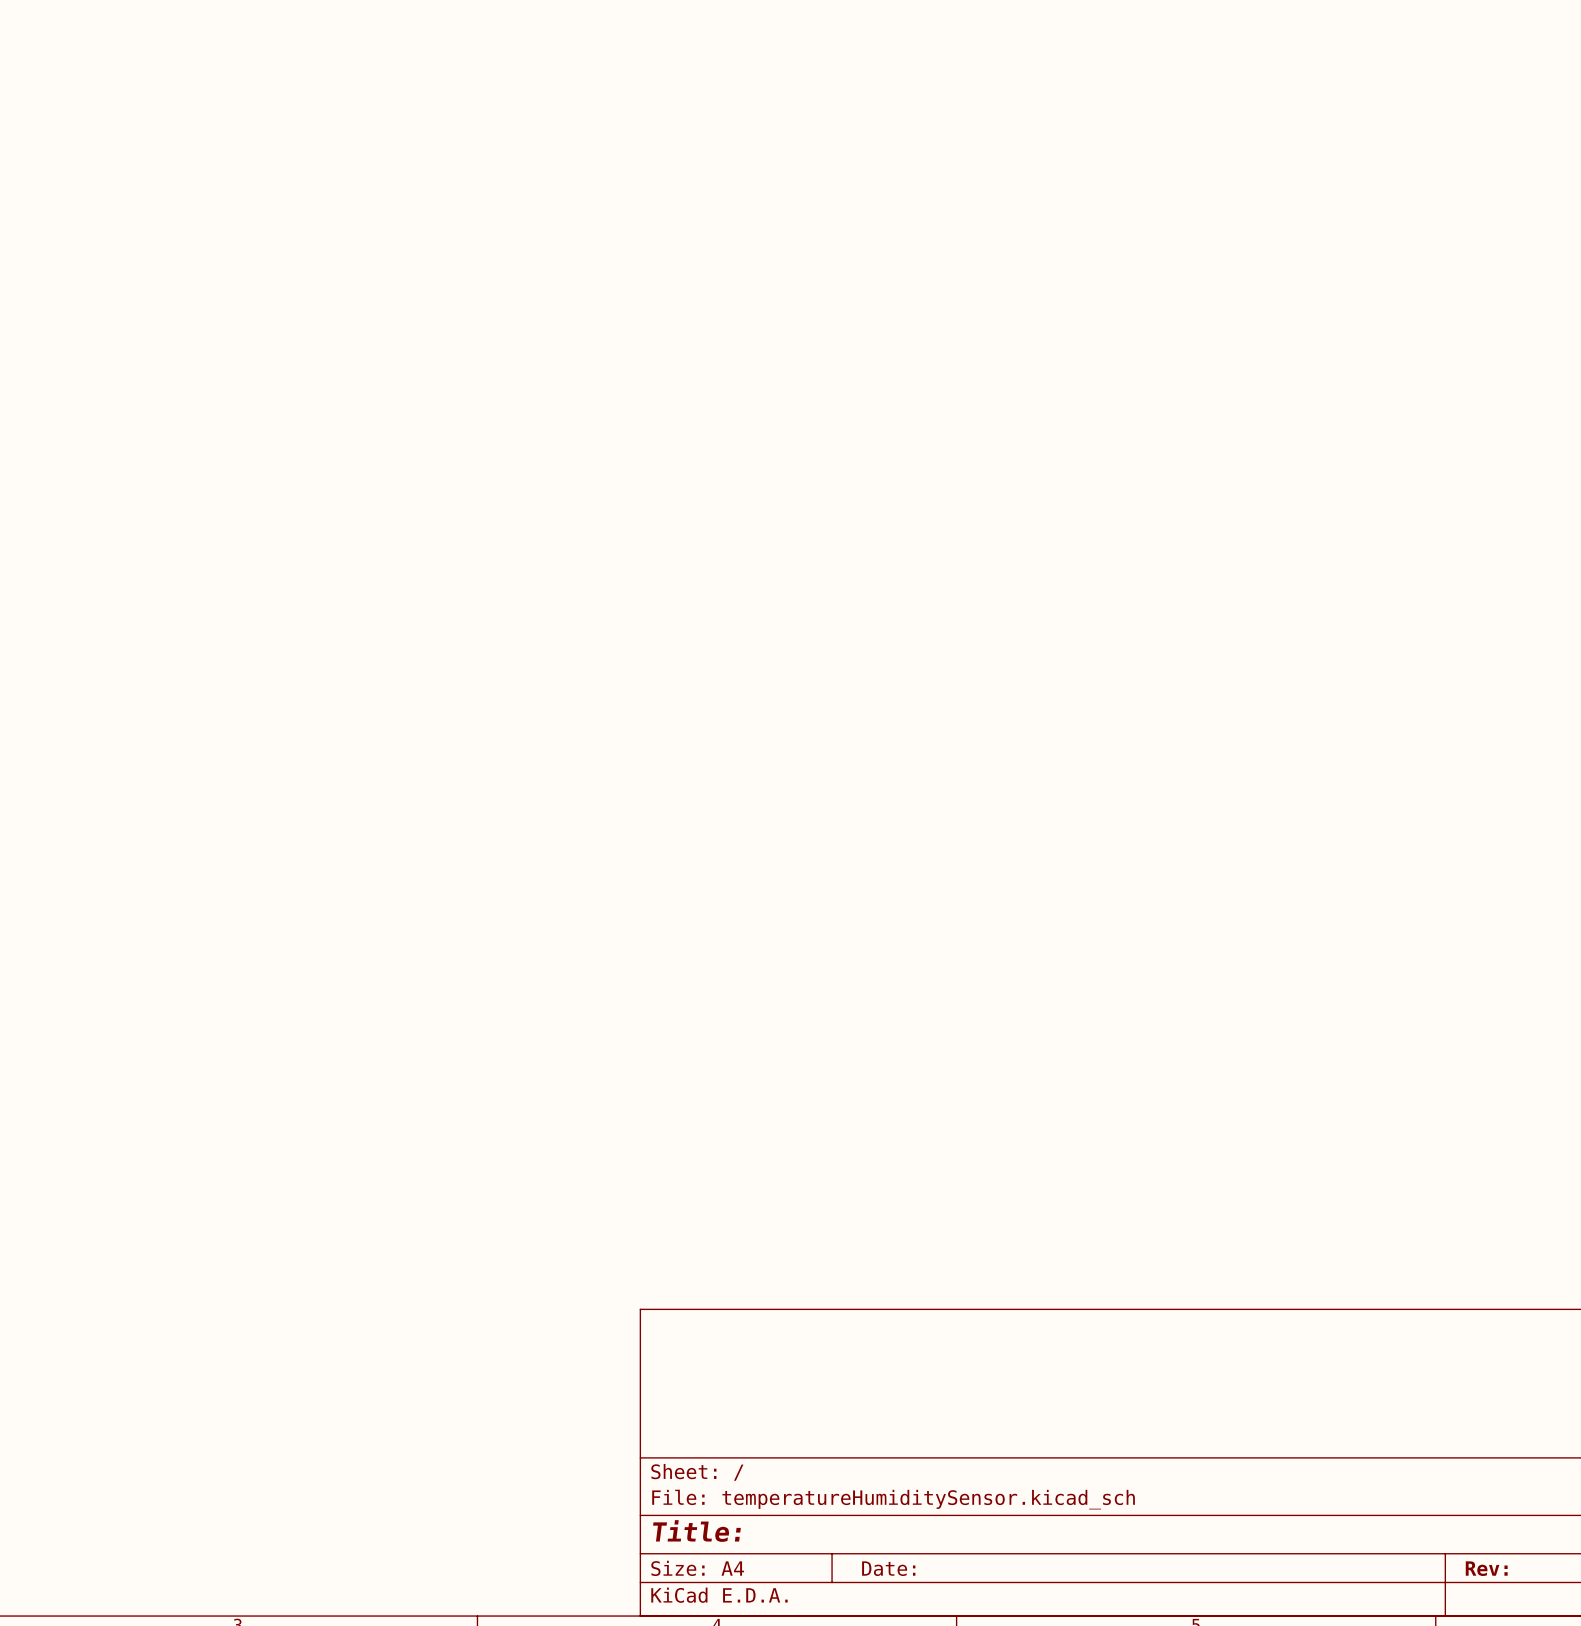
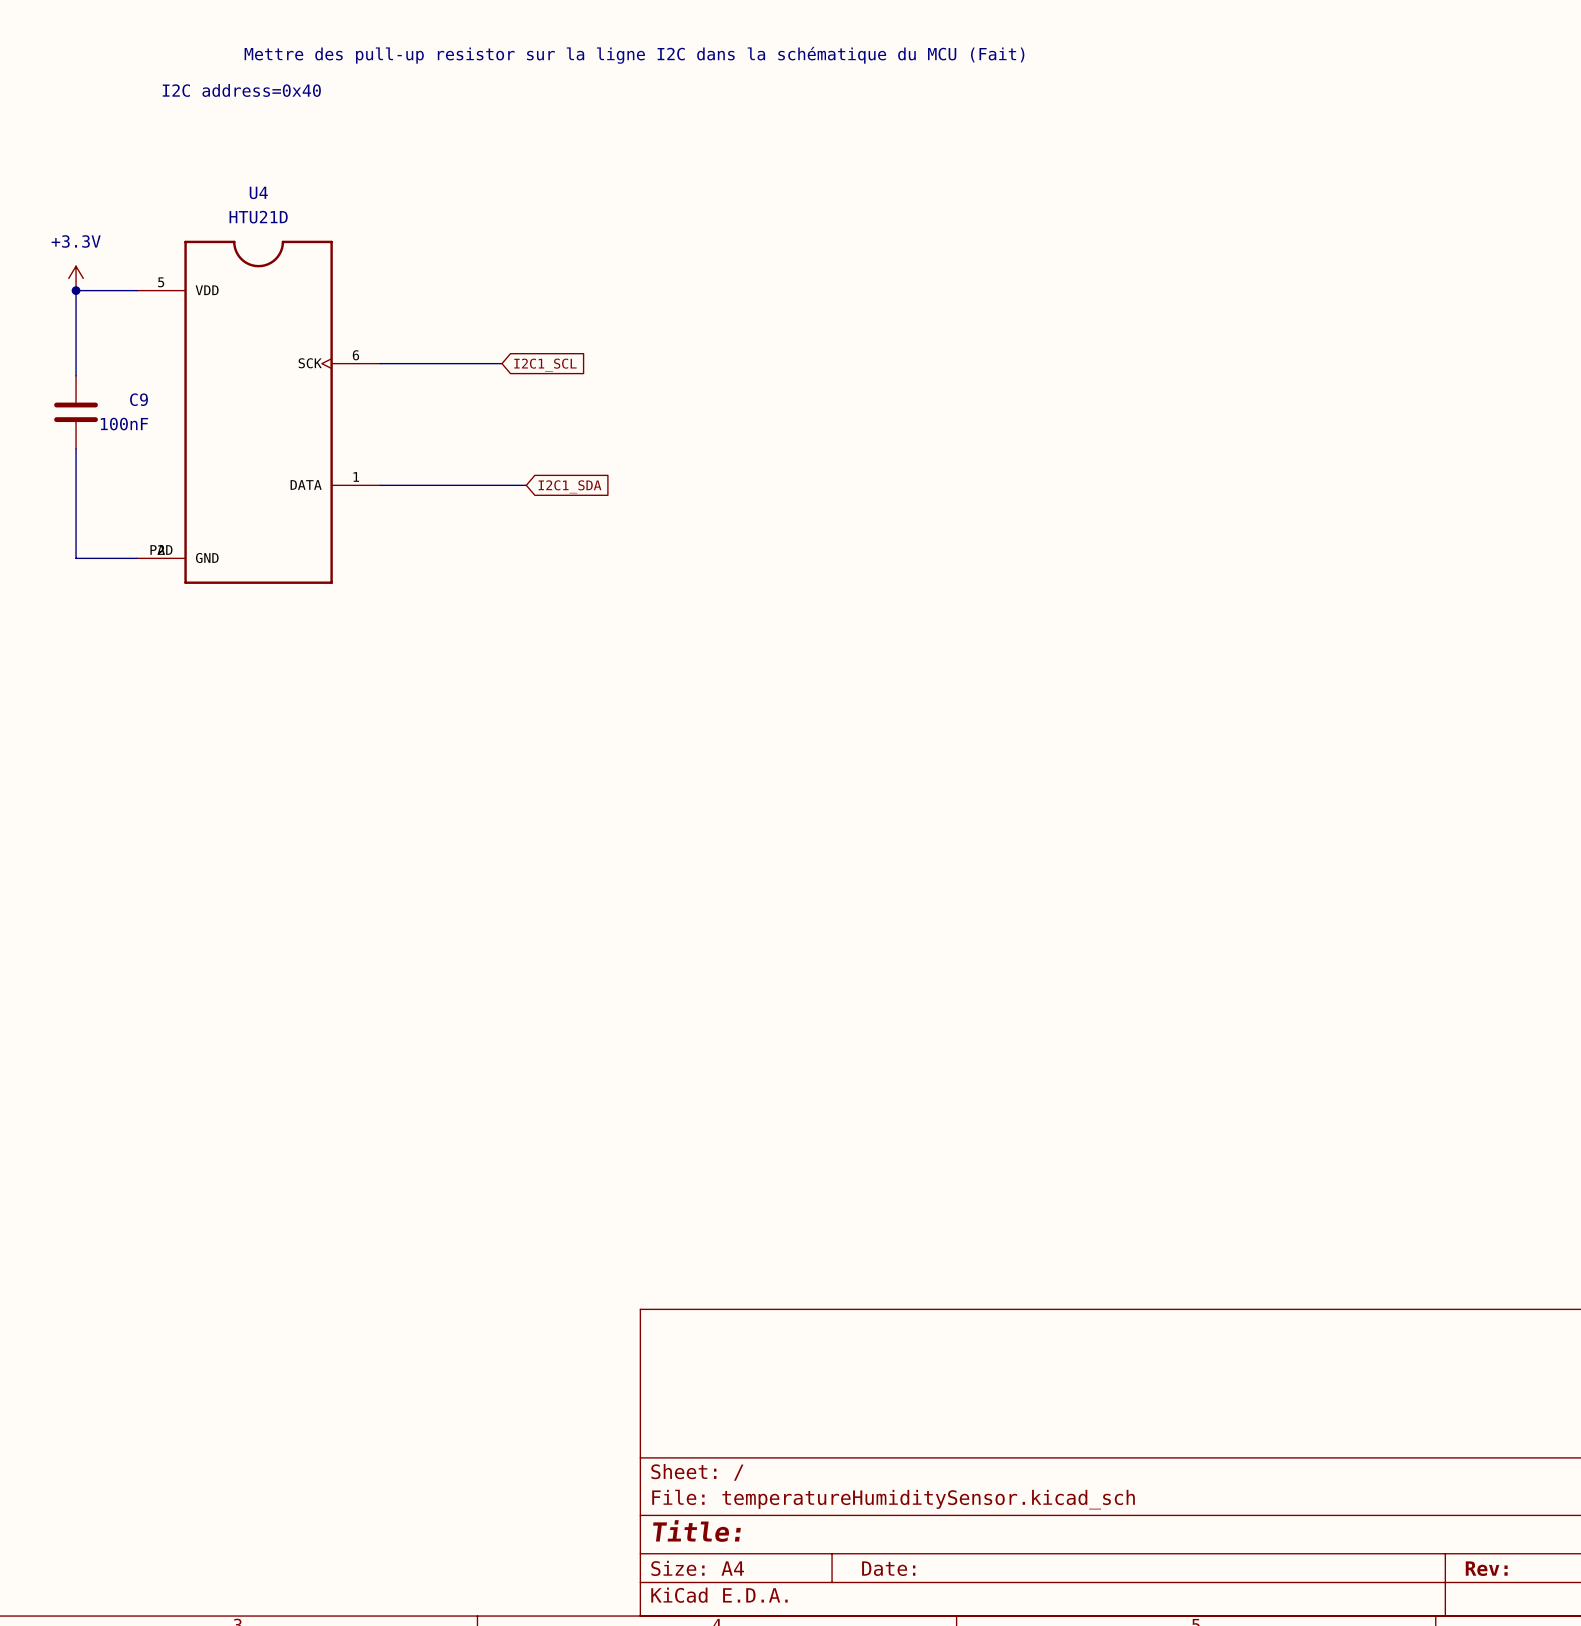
text: none -> Mettre des pull-up resistor sur la ligne I2C dans la schématique du MCU (Fait) (634, 55)
text: none -> I2C address=0x40 (241, 90)
power symbol: none -> +3.3V (76, 278)
junction: none -> (76, 290)
wire: none -> (136, 290) (76, 290) (76, 375)
wire: none -> (380, 363) (501, 363)
global label: none -> I2C1_SCL (545, 365)
C9: none -> 100nF (76, 412)
U4: none -> HTU21D (258, 412)
wire: none -> (76, 448) (76, 558) (136, 558)
wire: none -> (380, 485) (526, 485)
global label: none -> I2C1_SDA (569, 486)

